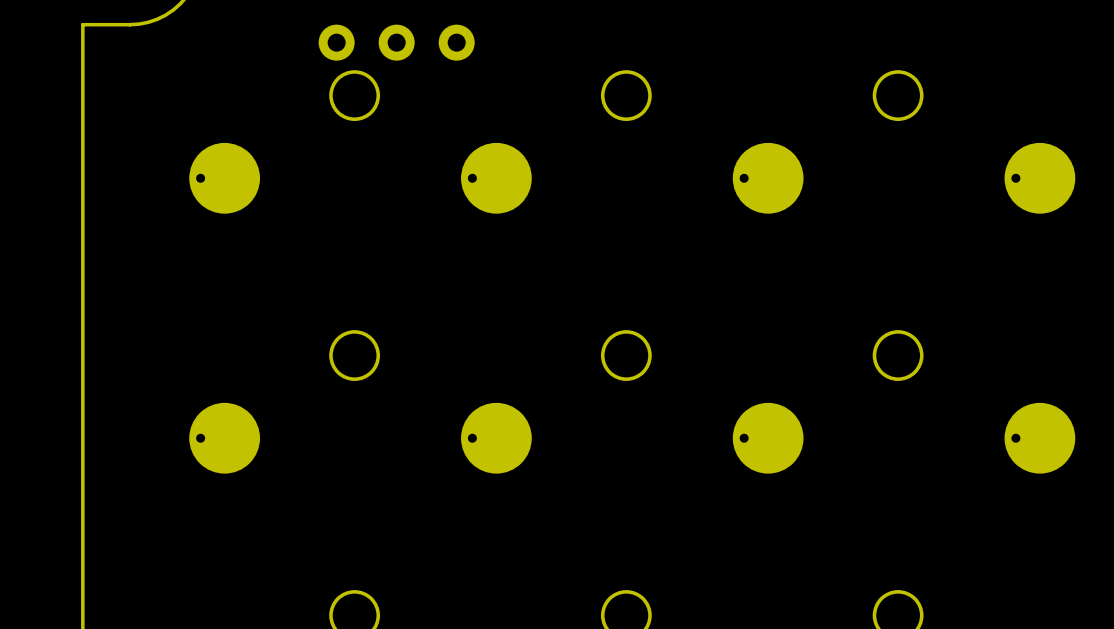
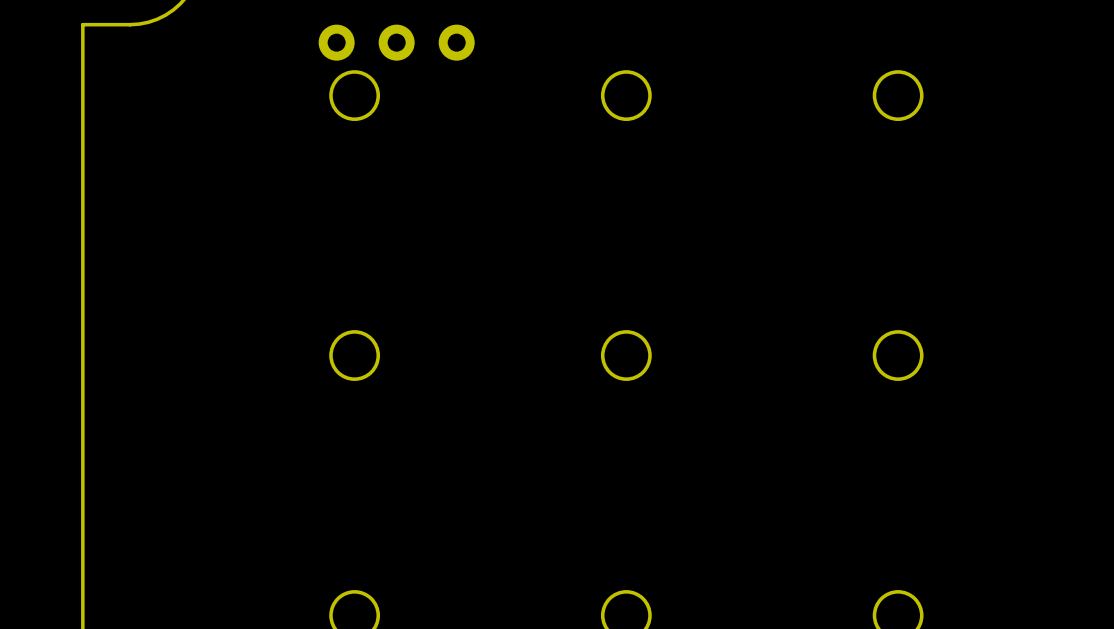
part: (224, 178) -> none
part: (496, 178) -> none
part: (768, 178) -> none
part: (1039, 178) -> none
part: (224, 438) -> none
part: (496, 438) -> none
part: (768, 438) -> none
part: (1039, 438) -> none

